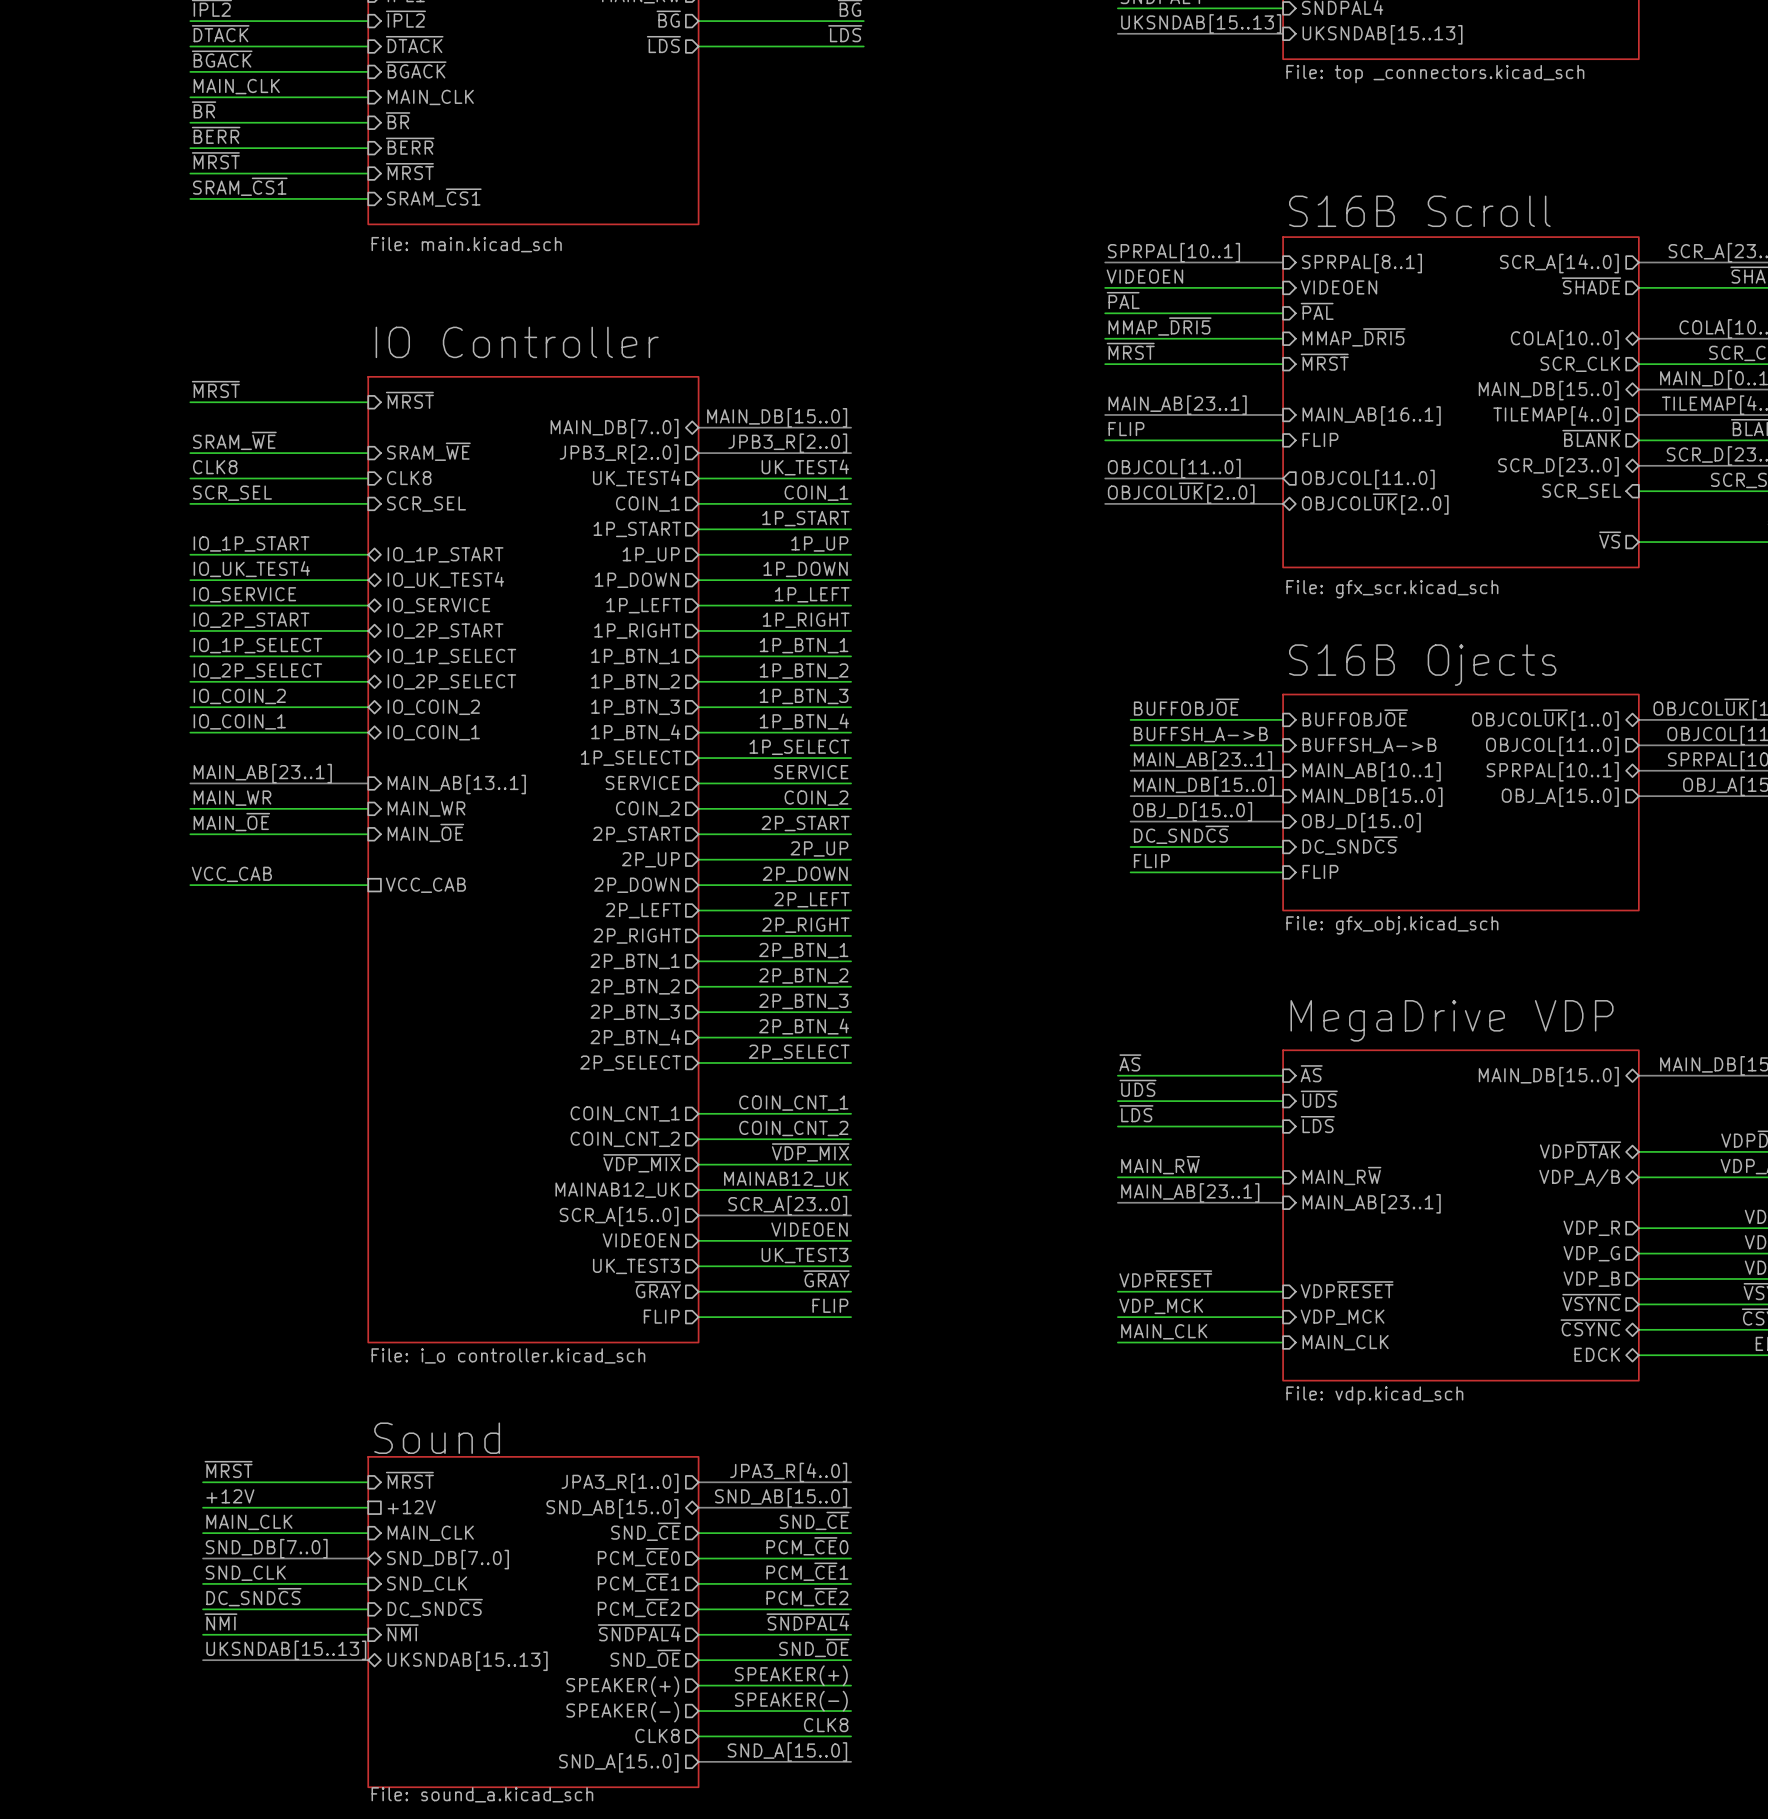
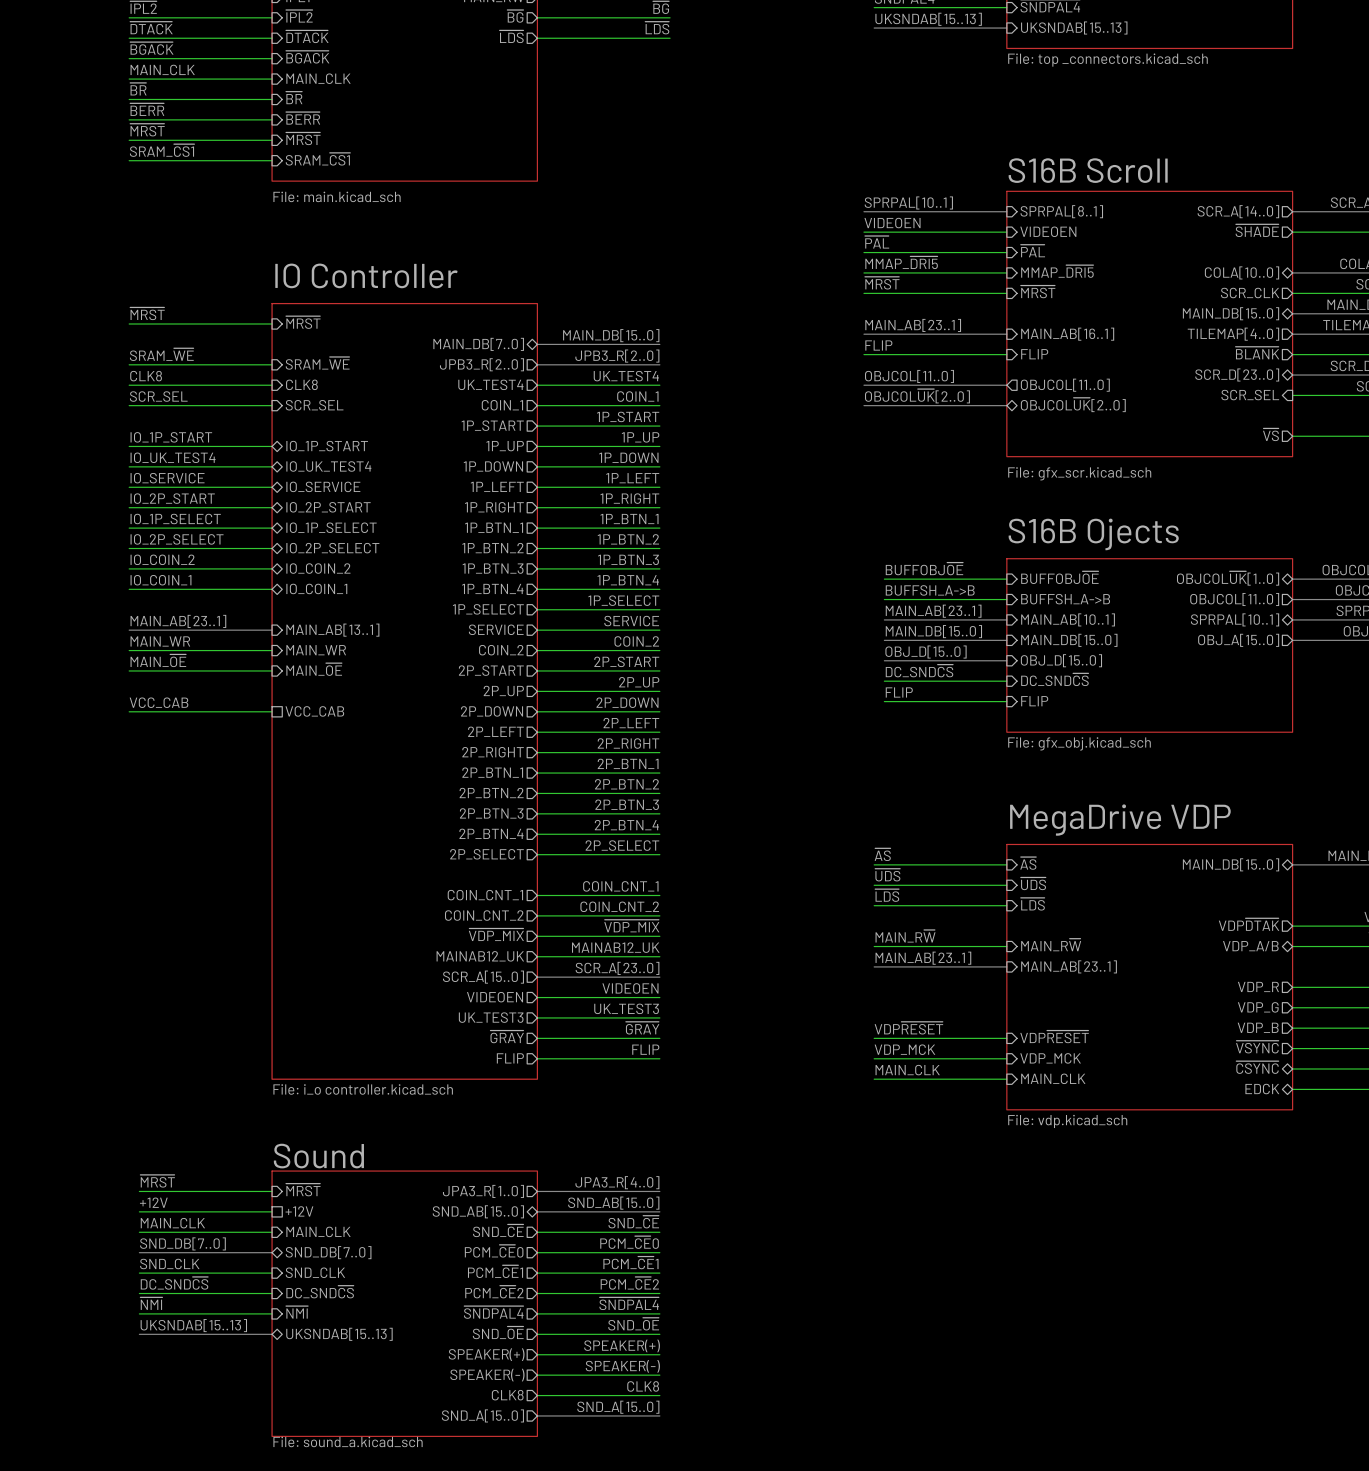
sheet pin shape: bidirectional (1580, 1150) -> output (1249, 924)

